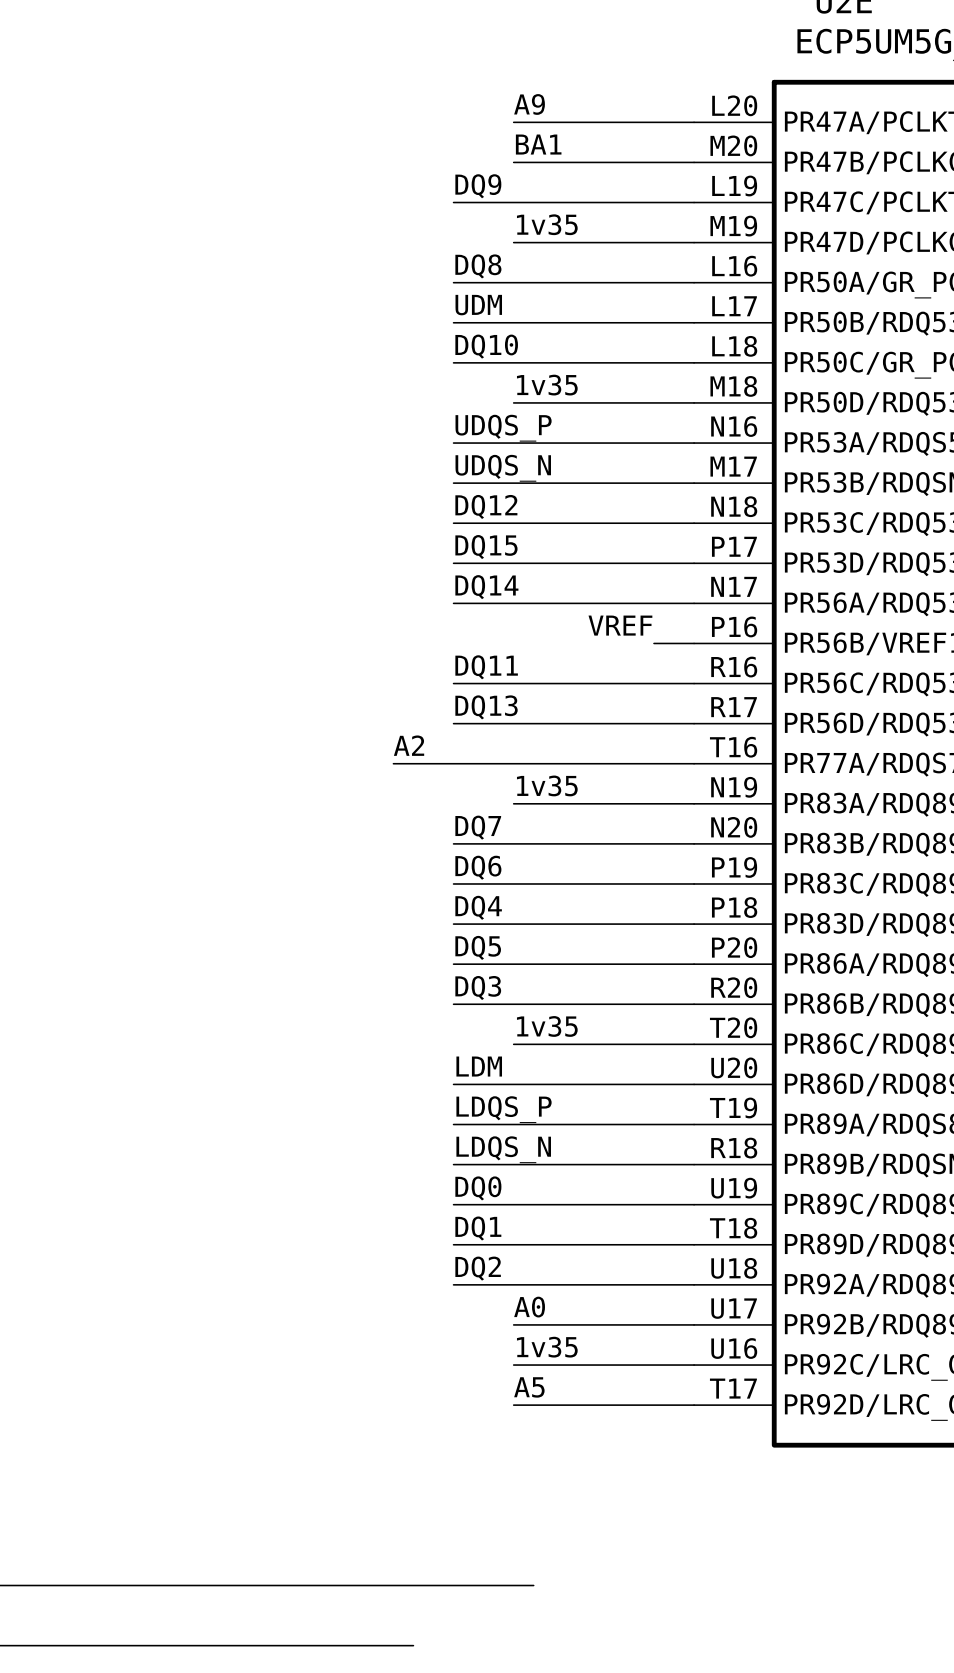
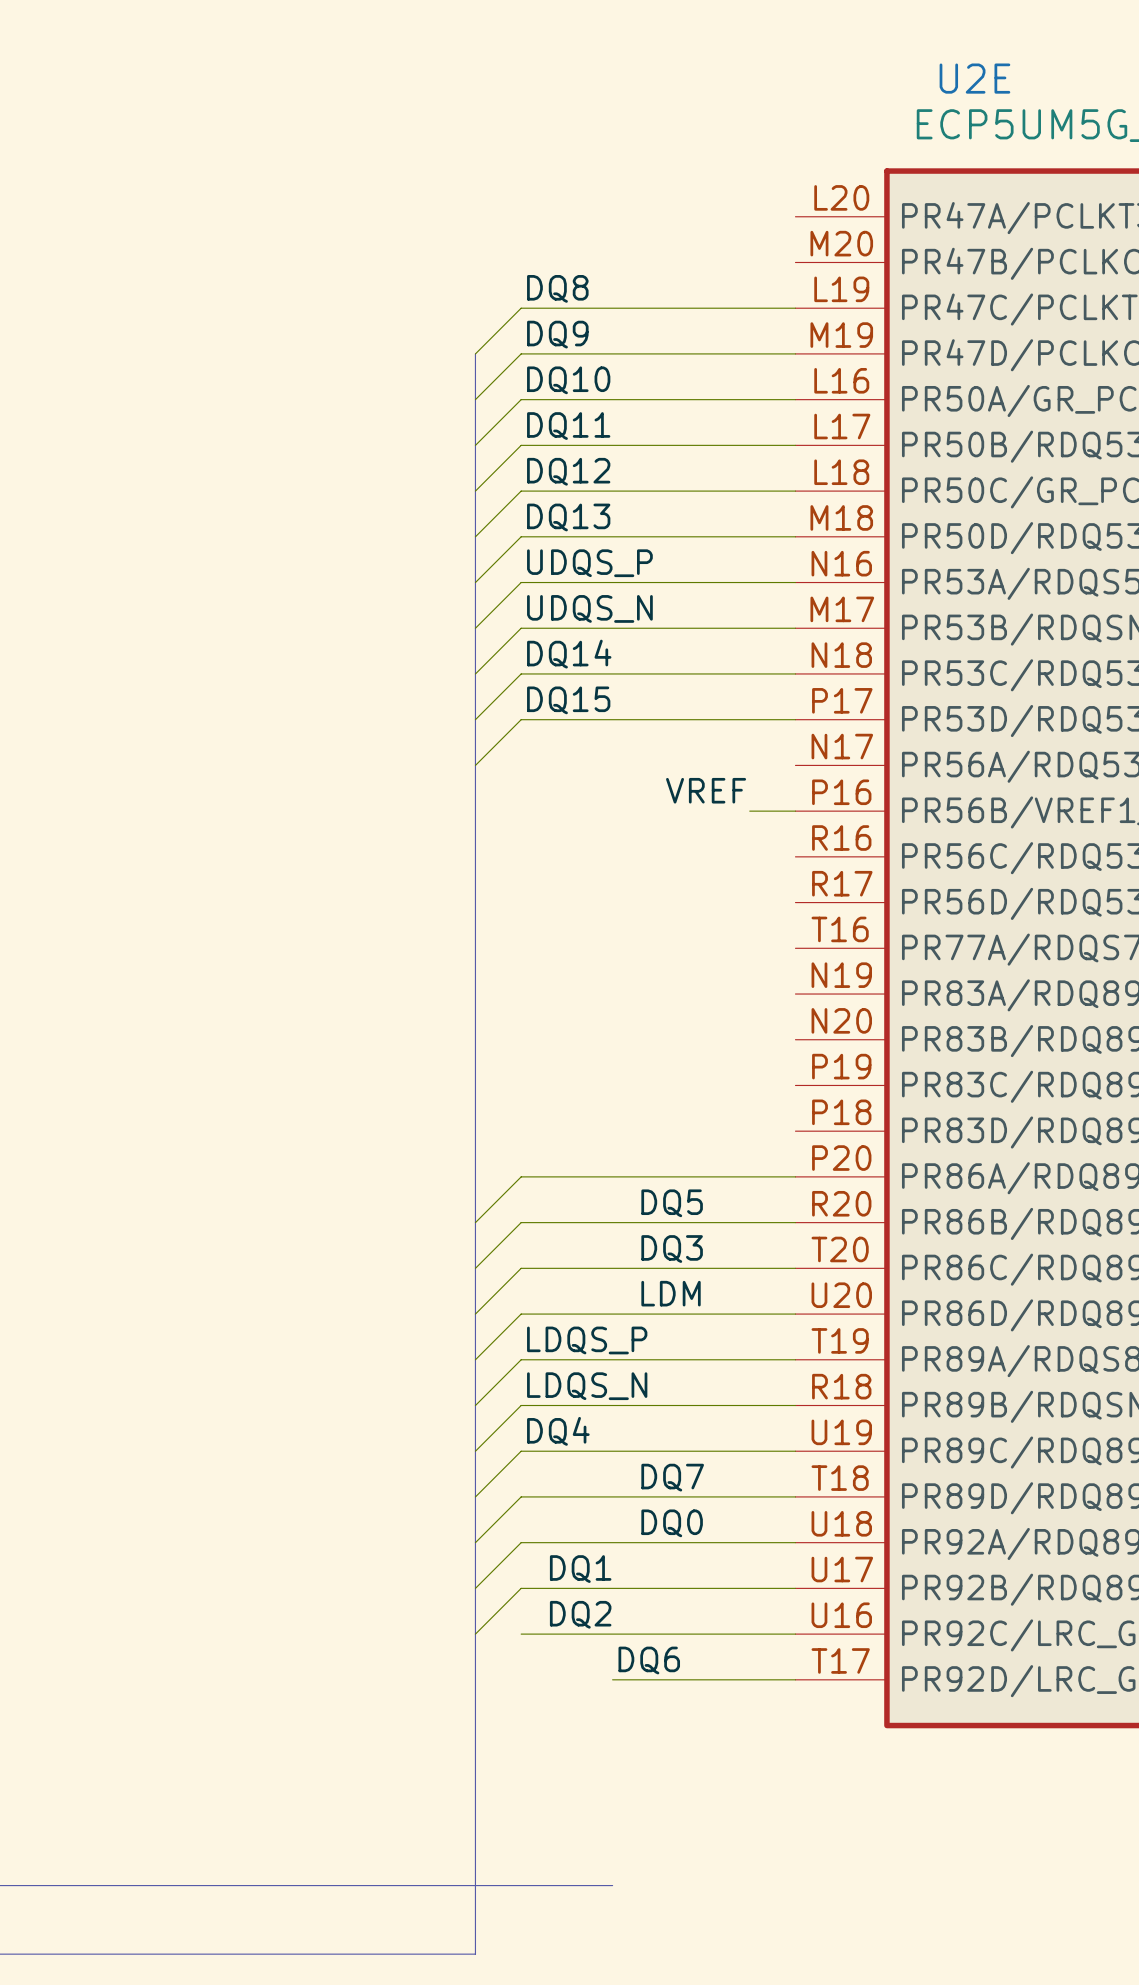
label: A9 (529, 104) -> none
wire: (513, 122) (694, 122) -> none
label: BA1 (538, 144) -> none
wire: (513, 162) (694, 162) -> none
label: DQ9 (478, 186) -> DQ8 (557, 288)
wire: none -> (521, 308) (475, 353)
label: 1v35 (547, 224) -> none
label: none -> DQ9 (557, 334)
bus: none -> (475, 353) (475, 1954)
wire: none -> (589, 353) (521, 353) (475, 399)
label: DQ8 (478, 266) -> DQ10 (568, 380)
wire: none -> (521, 399) (475, 445)
label: UDM (478, 305) -> DQ11 (568, 426)
wire: none -> (521, 445) (475, 491)
label: DQ10 (486, 346) -> DQ12 (568, 471)
wire: none -> (521, 491) (475, 536)
label: 1v35 (547, 385) -> none
wire: none -> (589, 536) (521, 536) (475, 582)
wire: none -> (521, 582) (475, 628)
wire: none -> (521, 628) (475, 673)
label: DQ12 (486, 506) -> DQ14 (569, 654)
wire: none -> (521, 673) (475, 719)
wire: none -> (521, 719) (475, 765)
label: DQ14 (486, 587) -> none
wire: (453, 603) (694, 603) -> none
label: DQ11 (486, 667) -> none
wire: (453, 683) (694, 683) -> none
label position: DQ13 (486, 707) -> DQ13 (568, 517)
wire: (453, 723) (694, 723) -> none
label: A2 (409, 745) -> none
wire: (393, 763) (694, 763) -> none
label: 1v35 (547, 785) -> none
wire: (513, 803) (694, 803) -> none
label: DQ7 (478, 827) -> none
wire: (453, 843) (694, 843) -> none
label: DQ6 (478, 867) -> none
wire: (453, 883) (694, 883) -> none
label: DQ4 (478, 907) -> none
wire: (453, 924) (694, 924) -> none
label position: DQ5 (478, 947) -> DQ5 (672, 1203)
wire: none -> (521, 1176) (475, 1222)
label position: DQ3 (478, 988) -> DQ3 (672, 1249)
wire: none -> (521, 1222) (475, 1268)
label: 1v35 (547, 1026) -> none
wire: none -> (589, 1268) (521, 1268) (475, 1314)
label position: LDM (479, 1066) -> LDM (671, 1293)
wire: none -> (521, 1314) (475, 1359)
wire: none -> (521, 1359) (475, 1405)
wire: none -> (521, 1405) (475, 1451)
label: DQ0 (478, 1188) -> DQ4 (558, 1431)
wire: none -> (521, 1451) (475, 1496)
label position: DQ1 (478, 1228) -> DQ1 (580, 1569)
label: none -> DQ7 (672, 1477)
wire: none -> (521, 1496) (475, 1542)
label position: DQ2 (478, 1268) -> DQ2 (580, 1614)
label: none -> DQ0 (672, 1523)
wire: none -> (521, 1542) (475, 1588)
label: A0 (529, 1307) -> none
wire: none -> (589, 1588) (521, 1588) (475, 1634)
label: 1v35 (547, 1347) -> none
wire: none -> (521, 1634) (589, 1634)
label: A5 (529, 1387) -> none
label: none -> DQ6 (649, 1660)
wire: (513, 1405) (533, 1405) -> none

